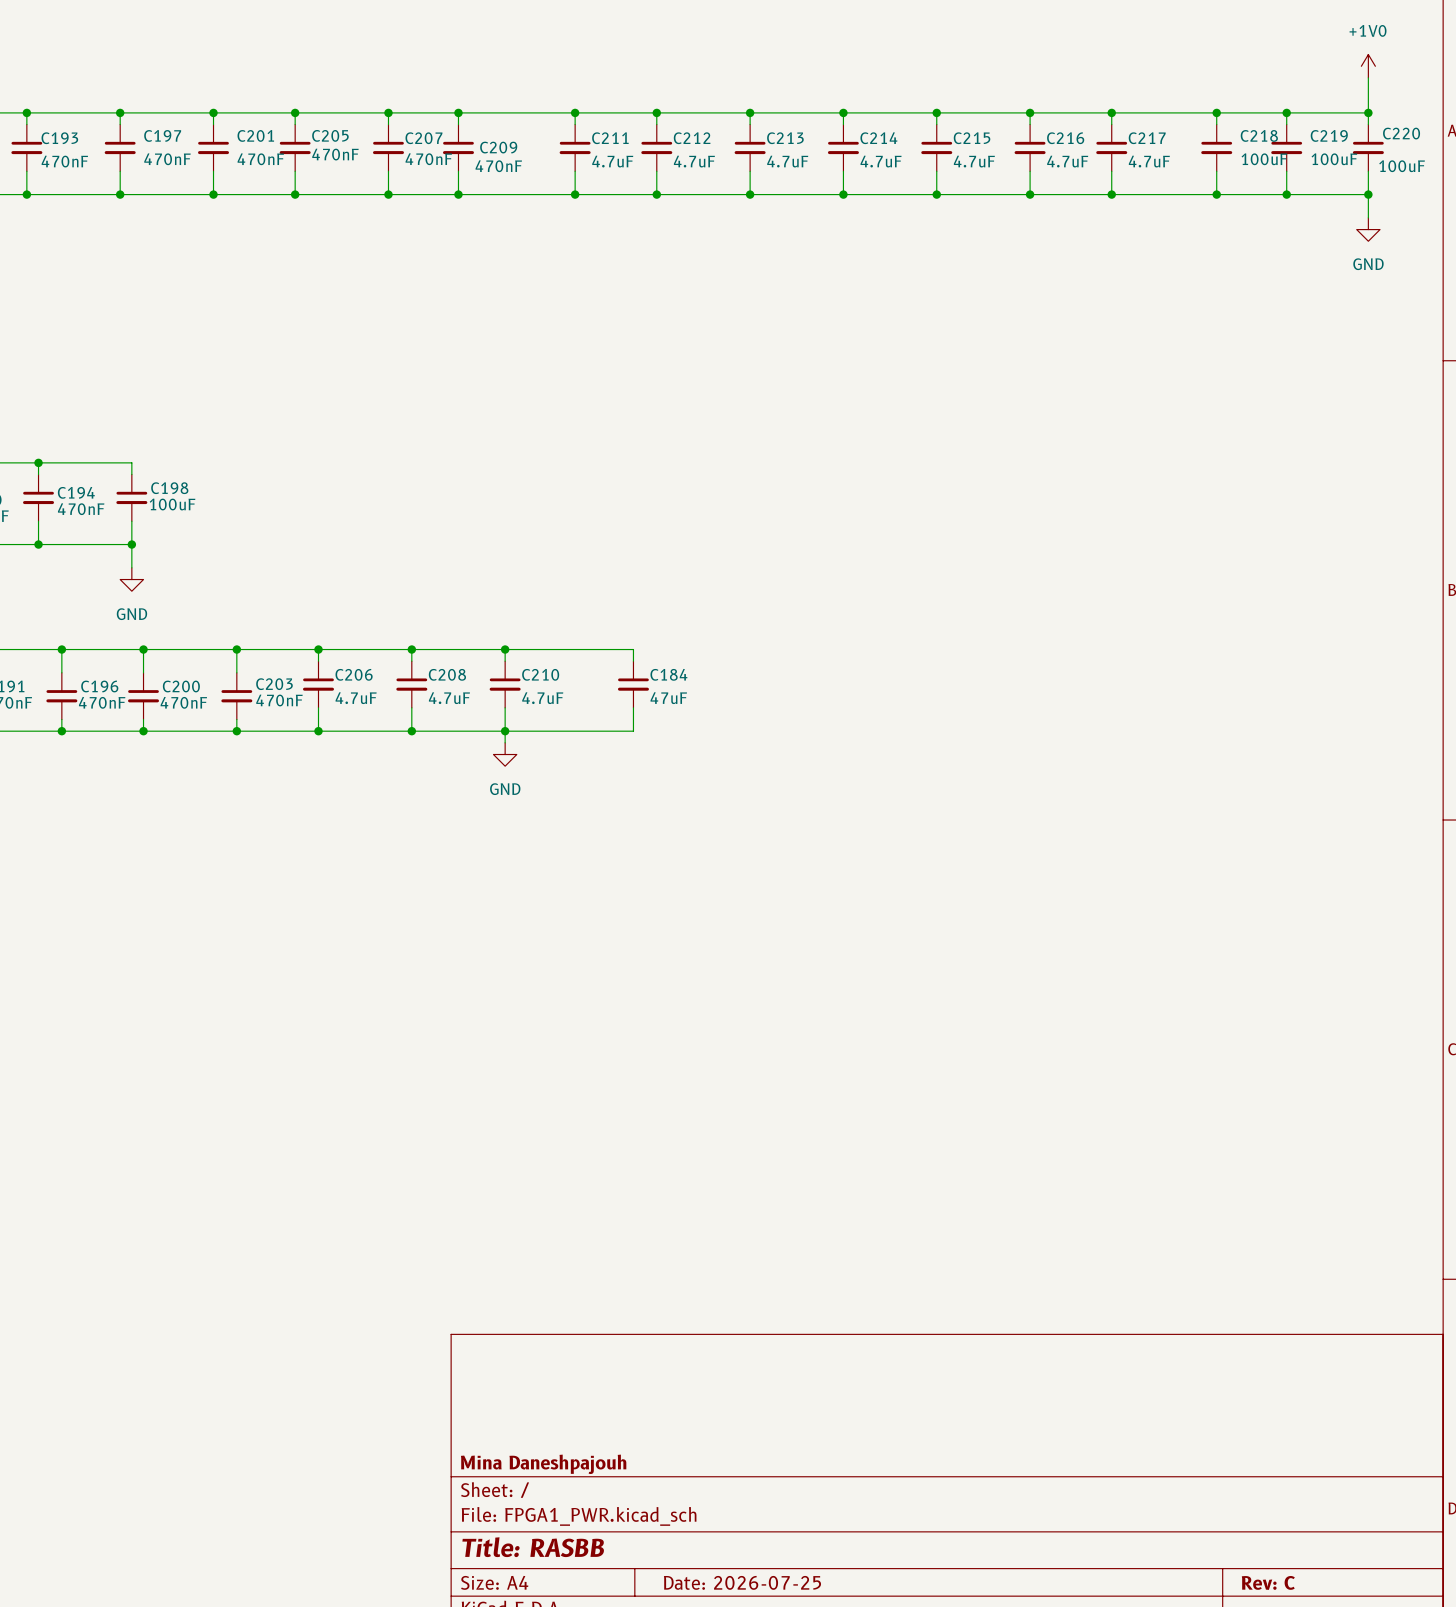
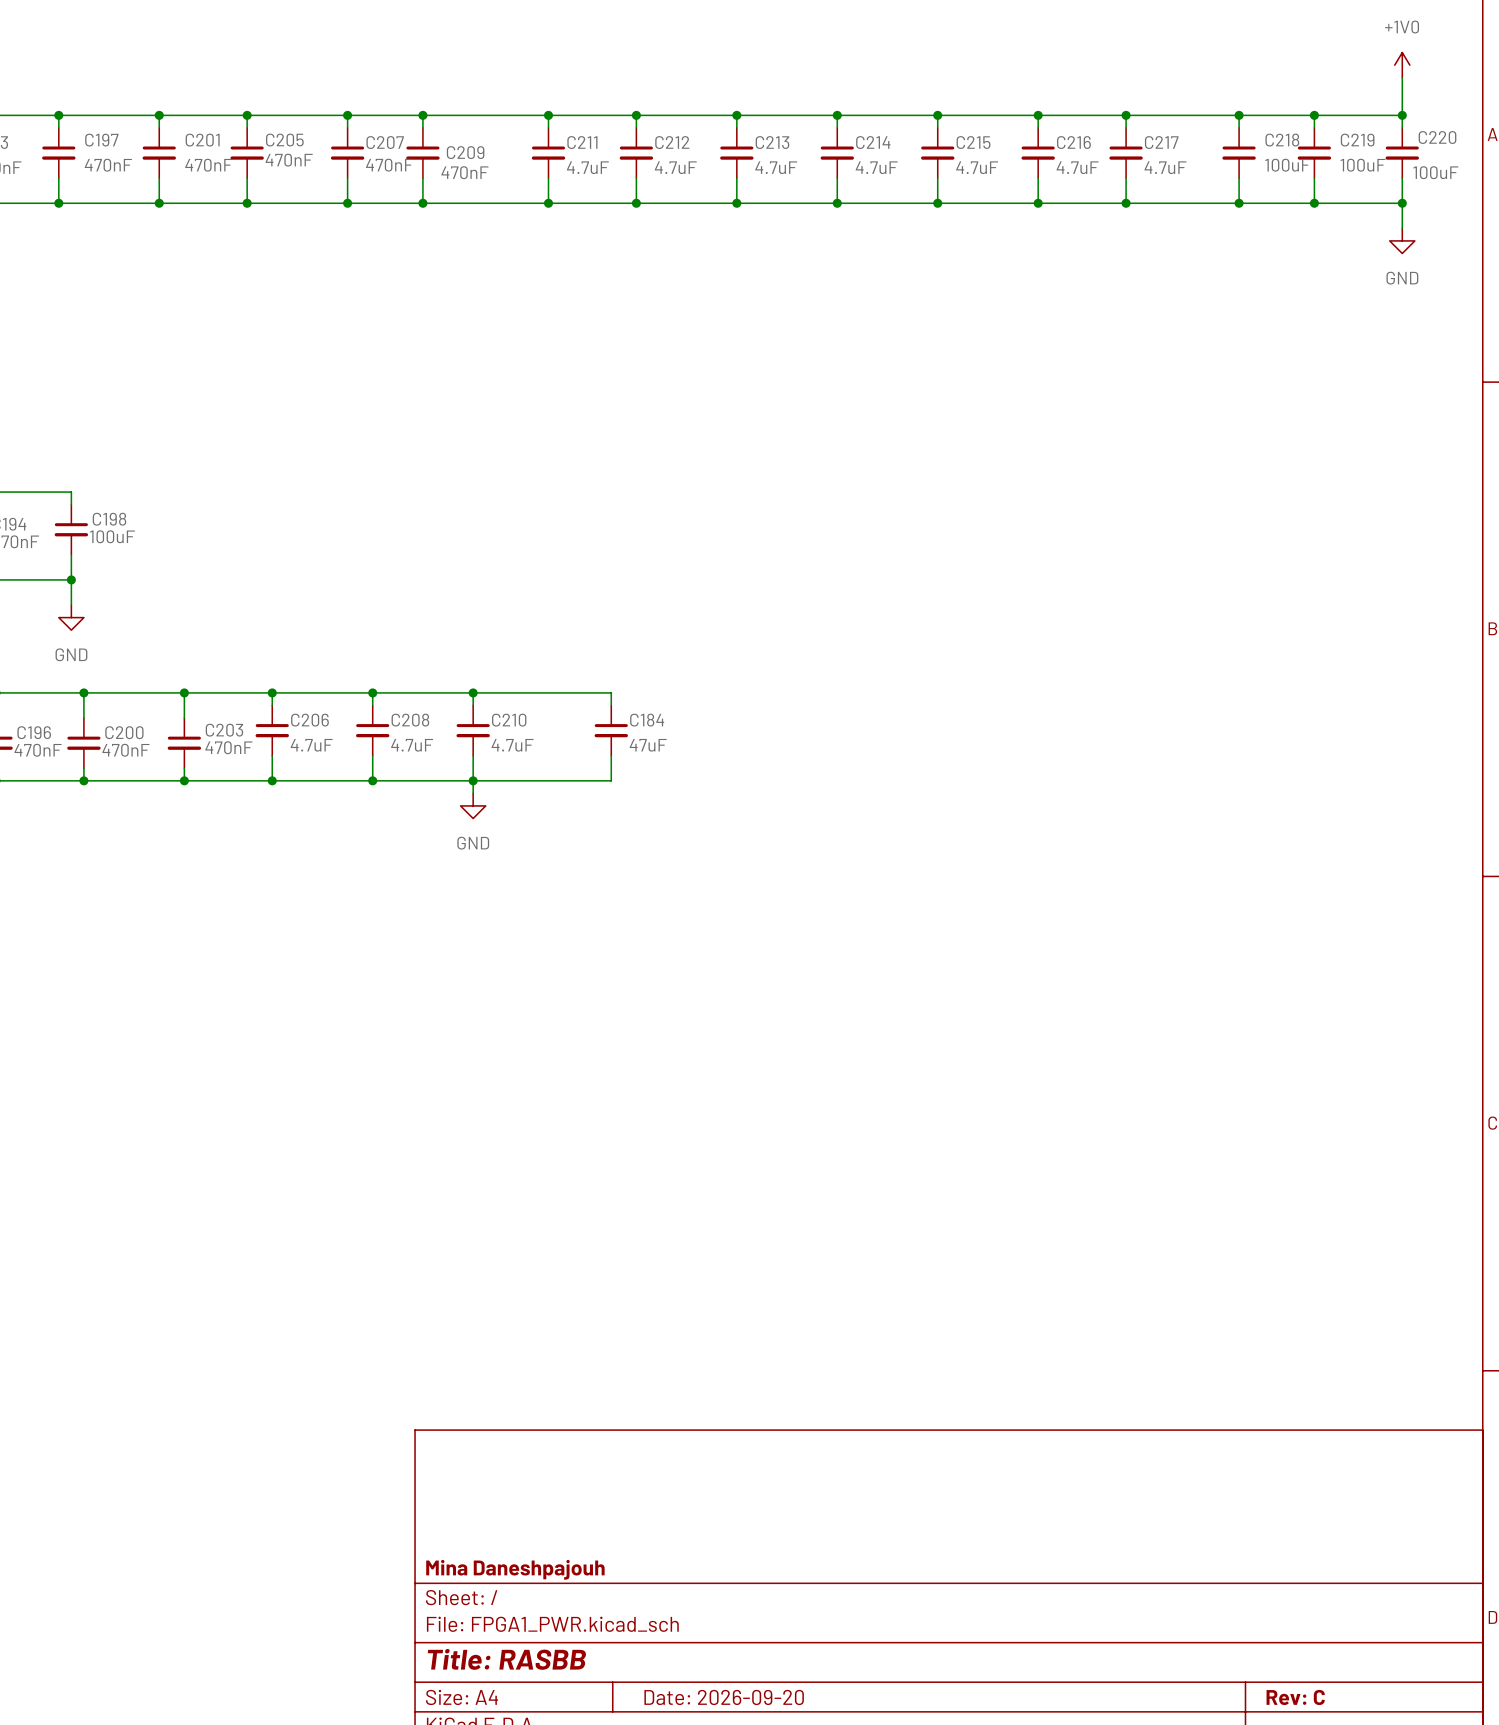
title block: Date: 2026-07-25 (742, 1582) -> Date: 2026-09-20 (724, 1697)

